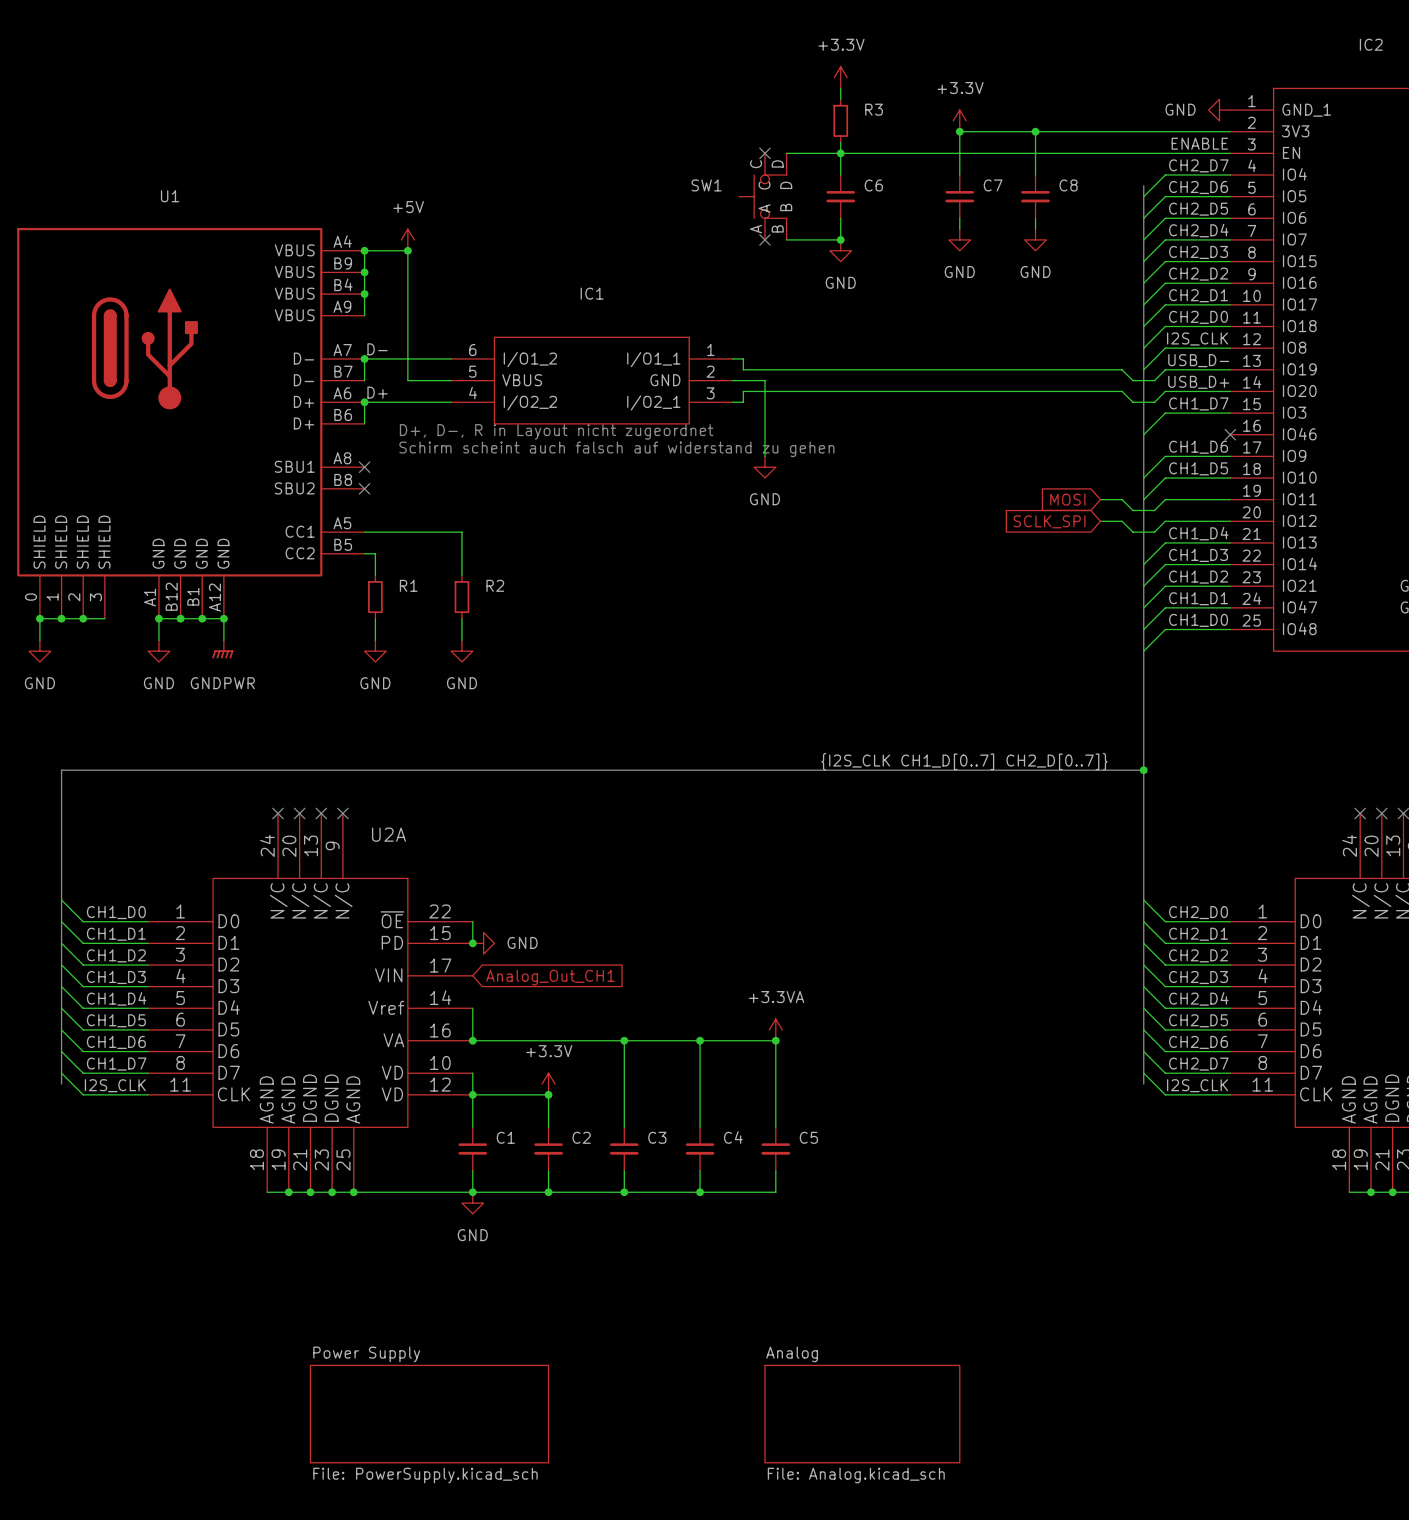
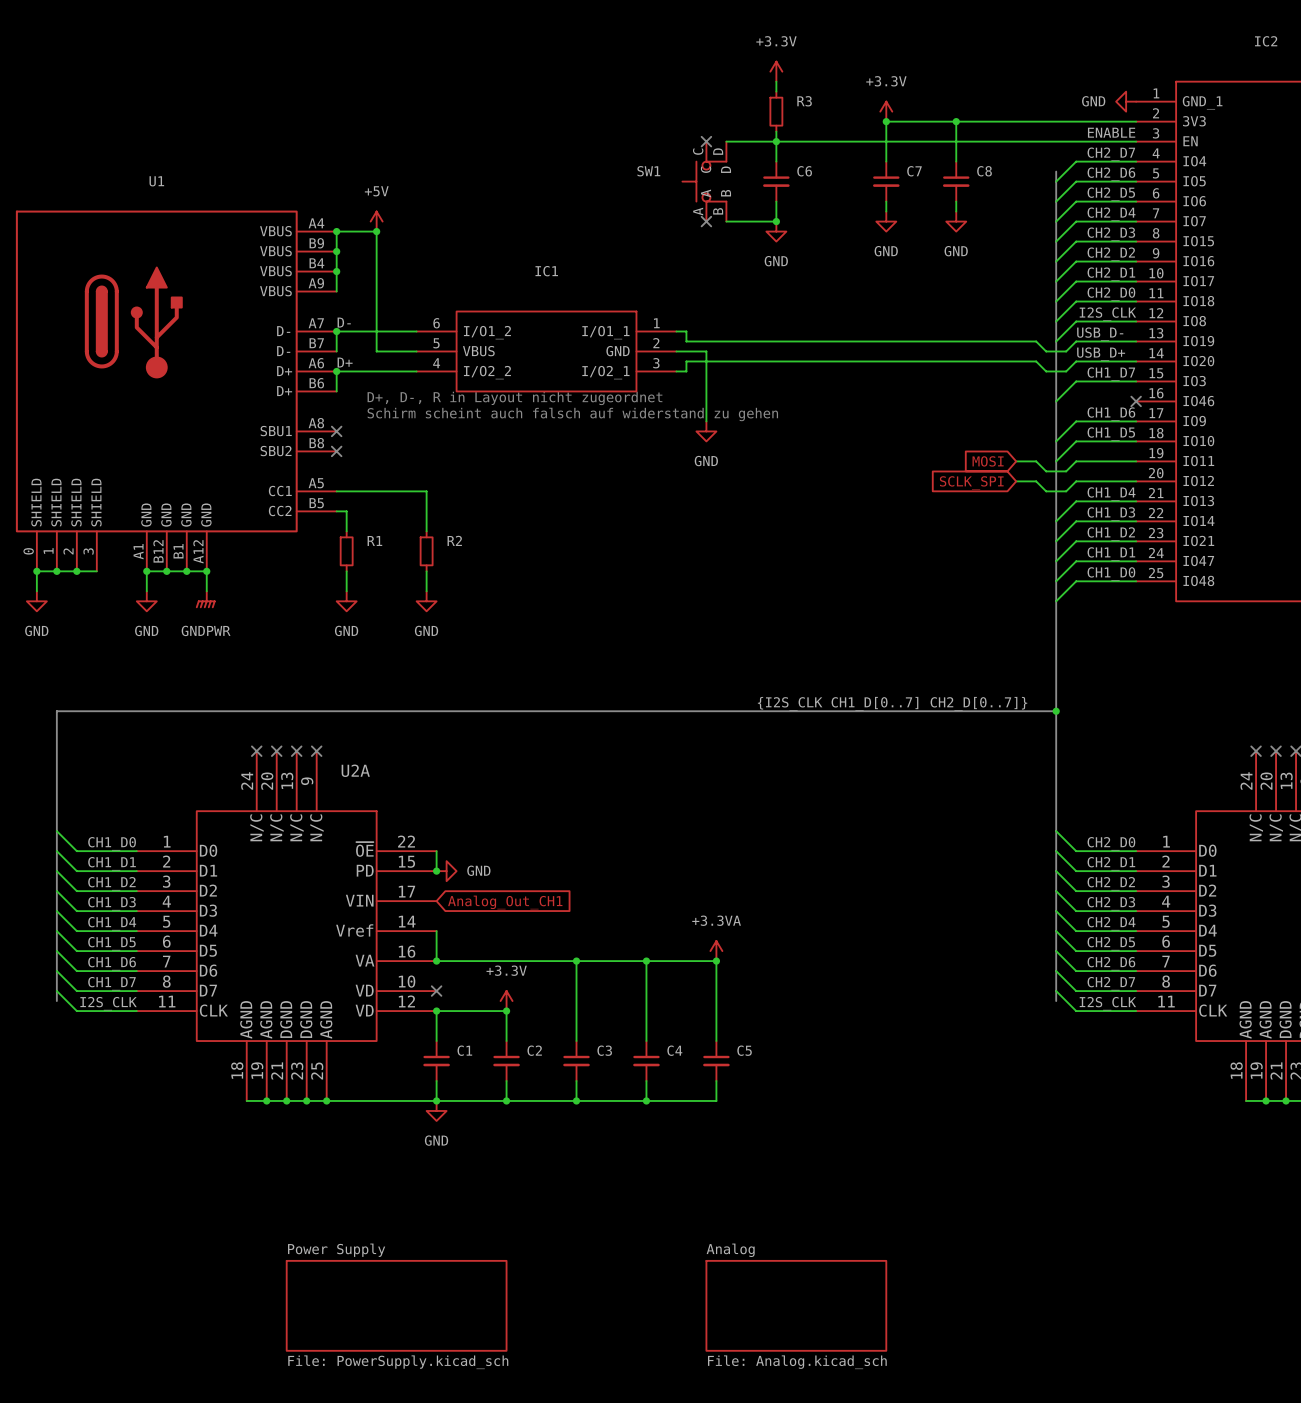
wire: (472, 1073) (472, 1094) -> none
no-connect mark: none -> (436, 991)

